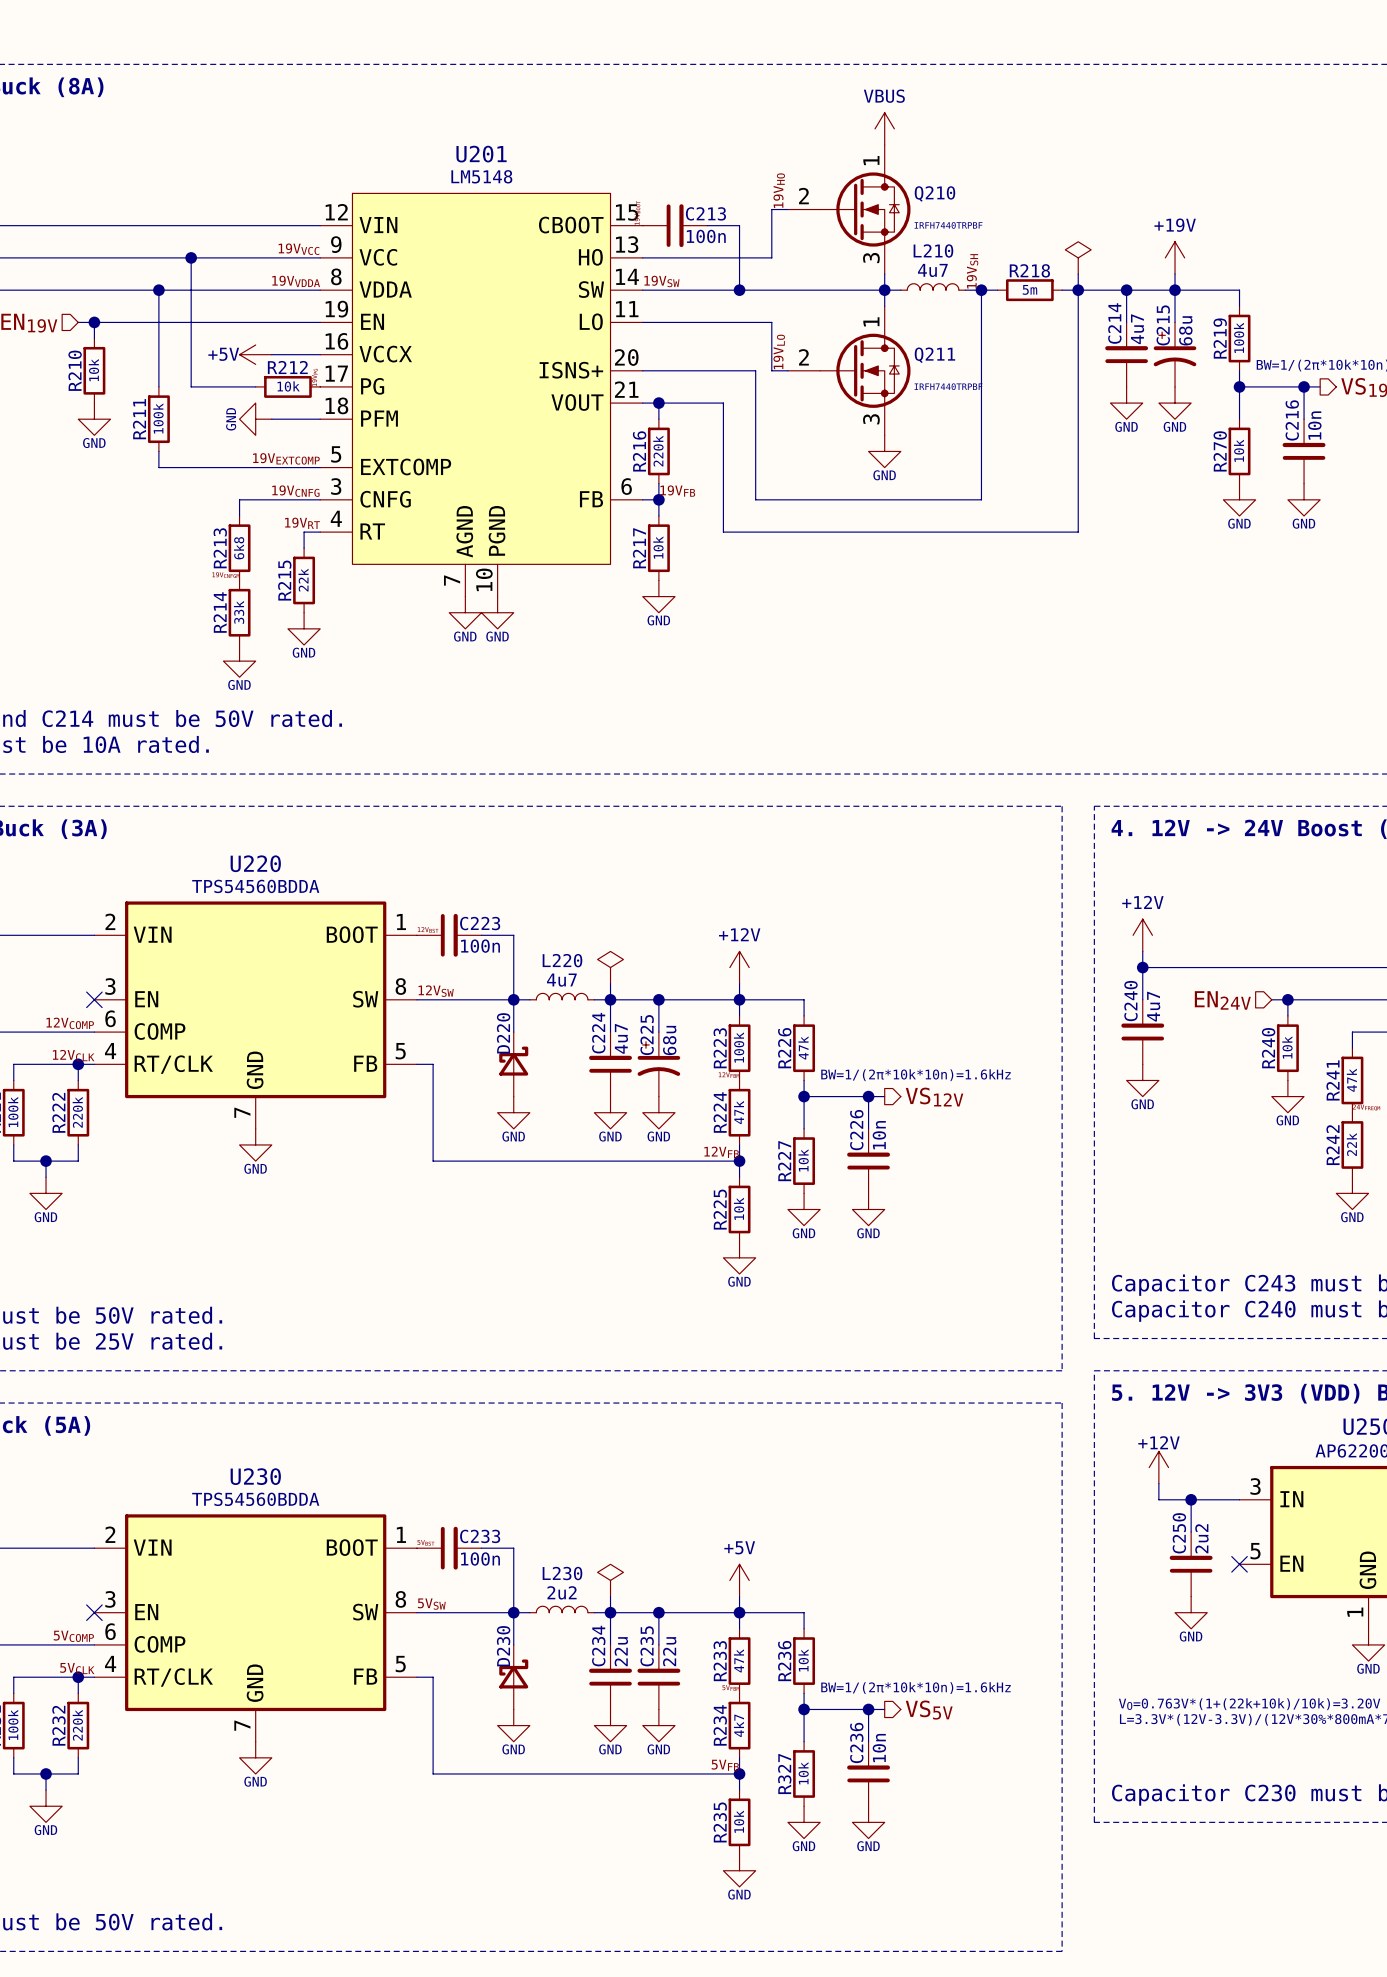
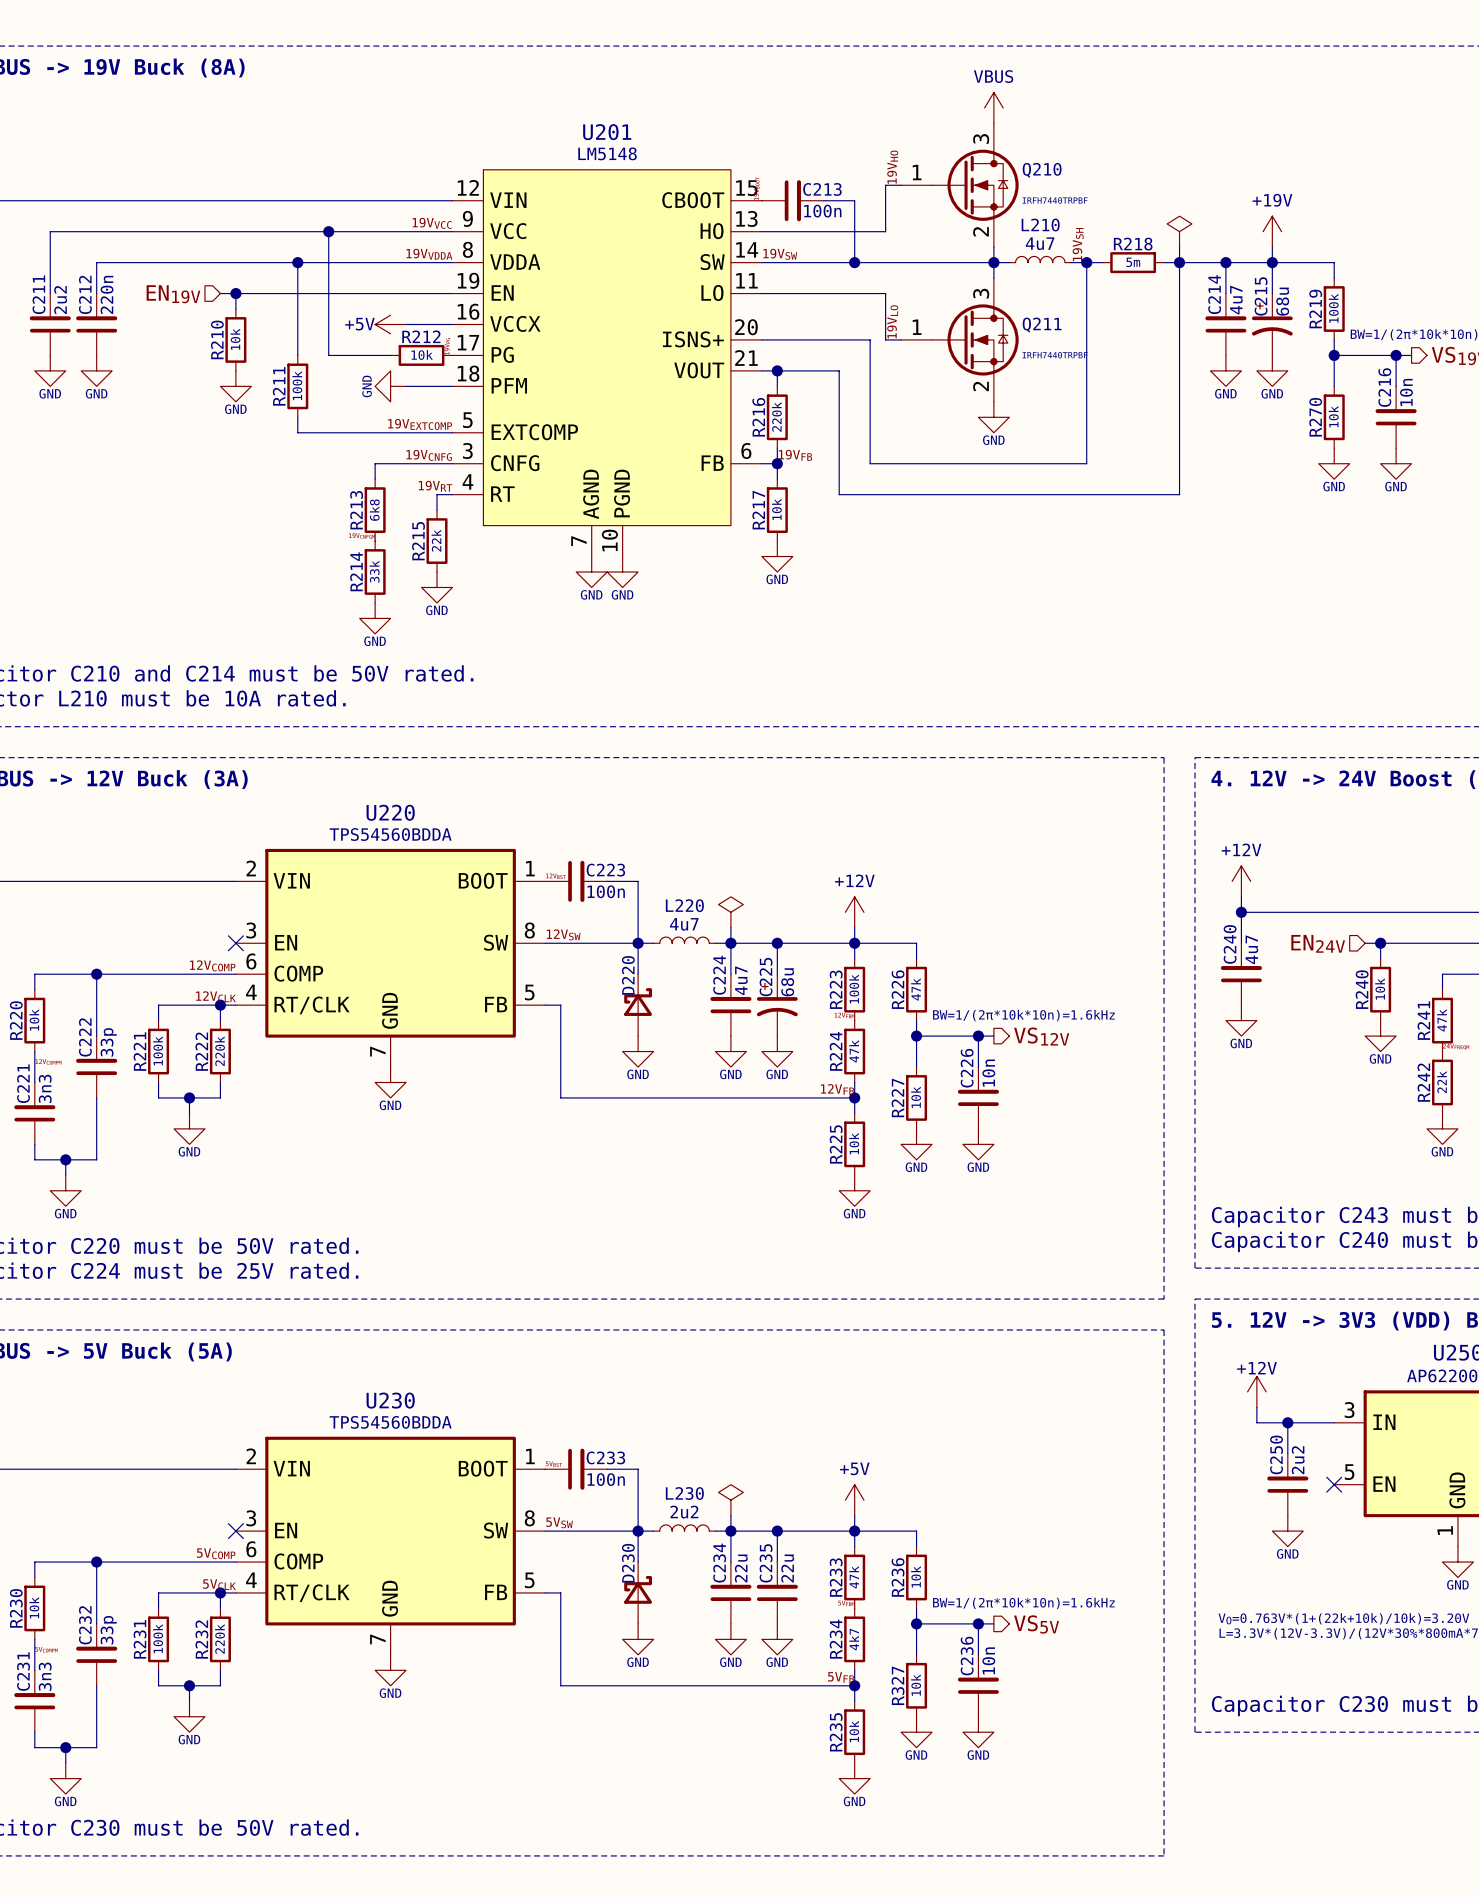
Q210 pin number: 1 (871, 160) -> 3 (981, 138)
Q210 pin number: 2 (803, 196) -> 1 (917, 172)
Q210 pin number: 3 (871, 258) -> 2 (981, 231)
Q211 pin number: 1 (871, 321) -> 3 (981, 293)
Q211 pin number: 2 (803, 357) -> 1 (917, 327)
Q211 pin number: 3 (871, 419) -> 2 (981, 386)

